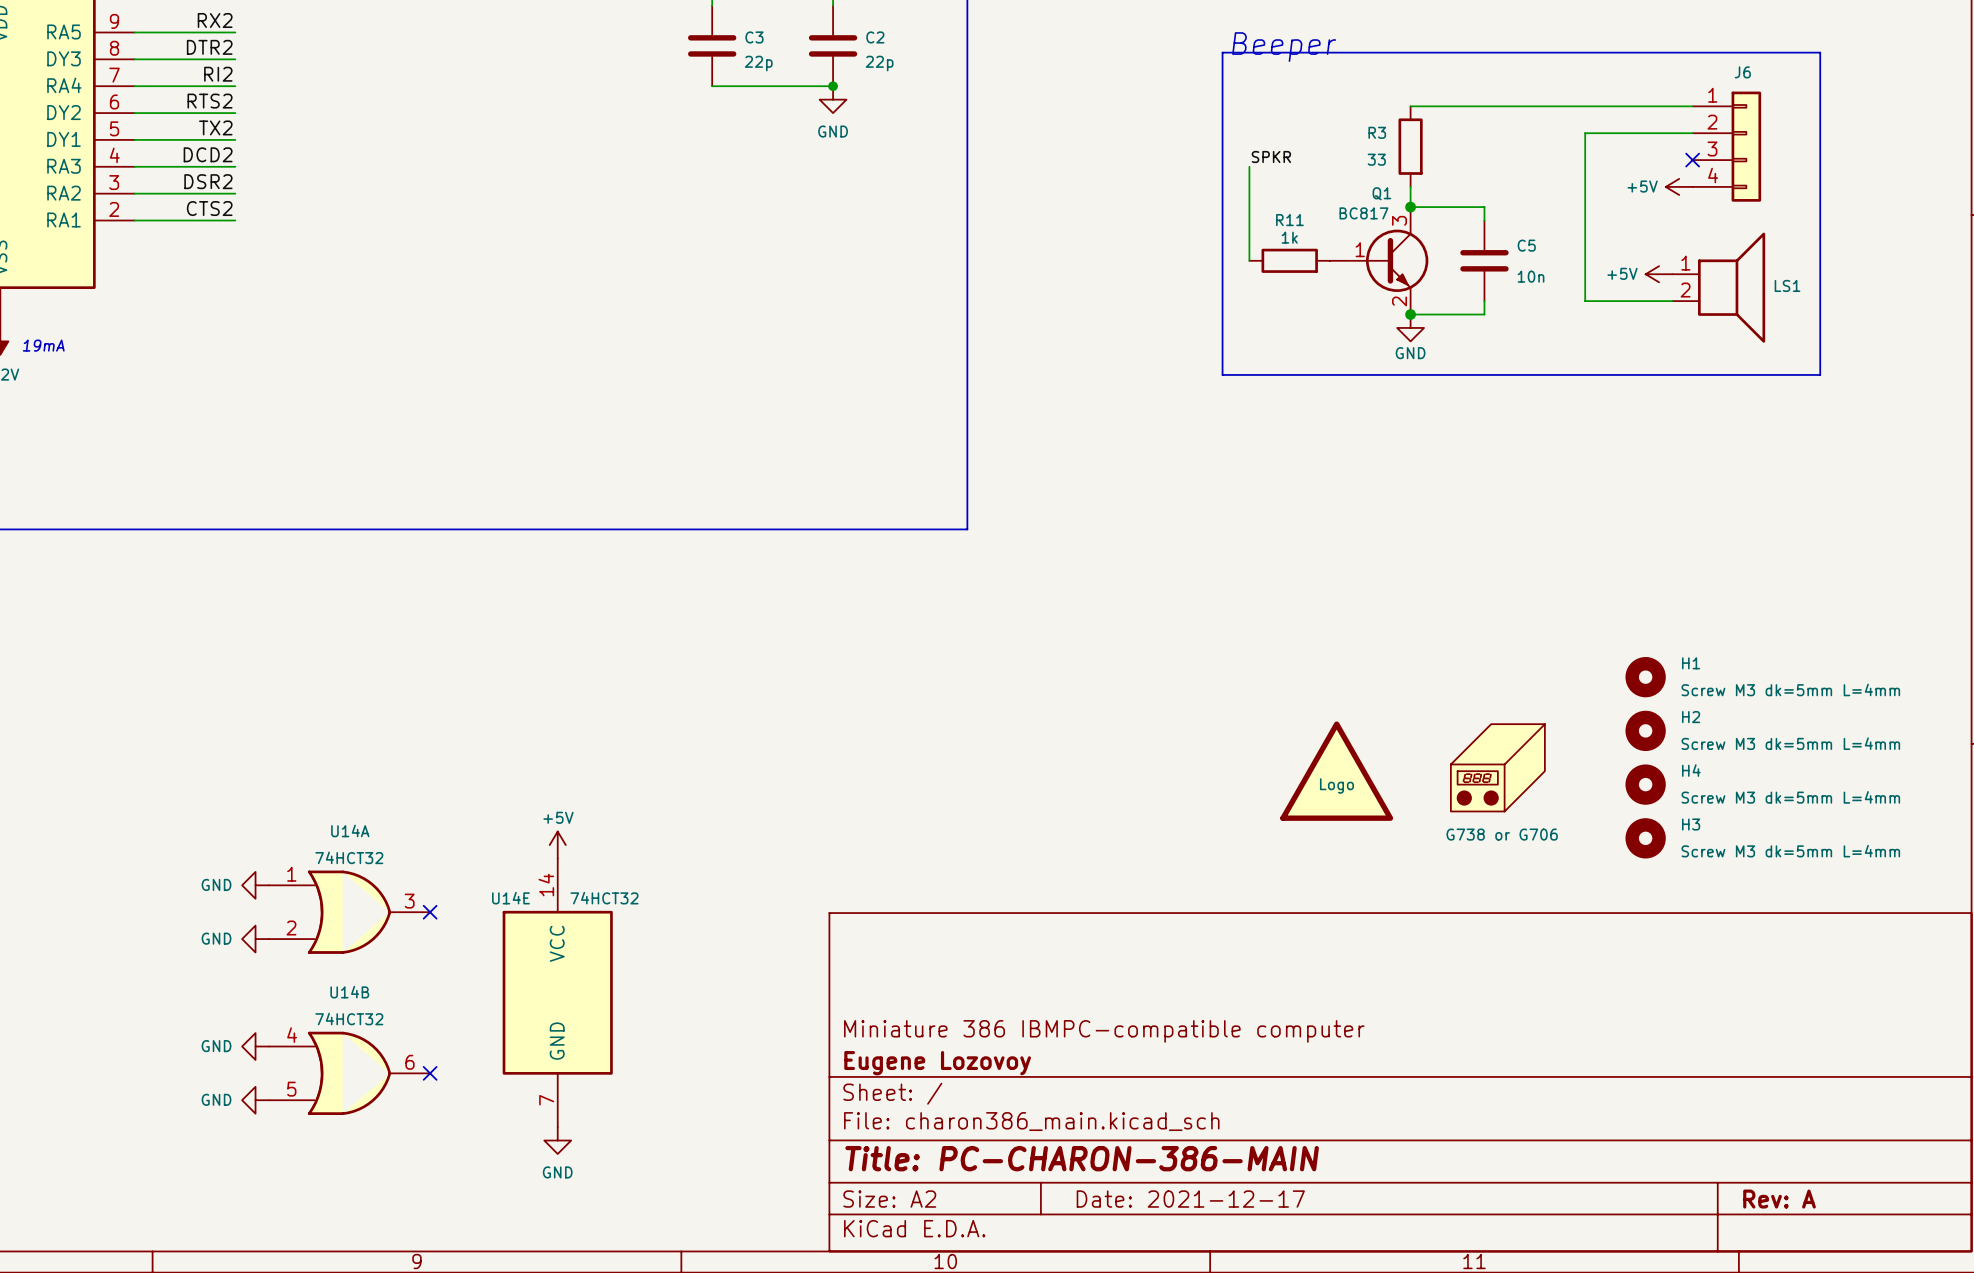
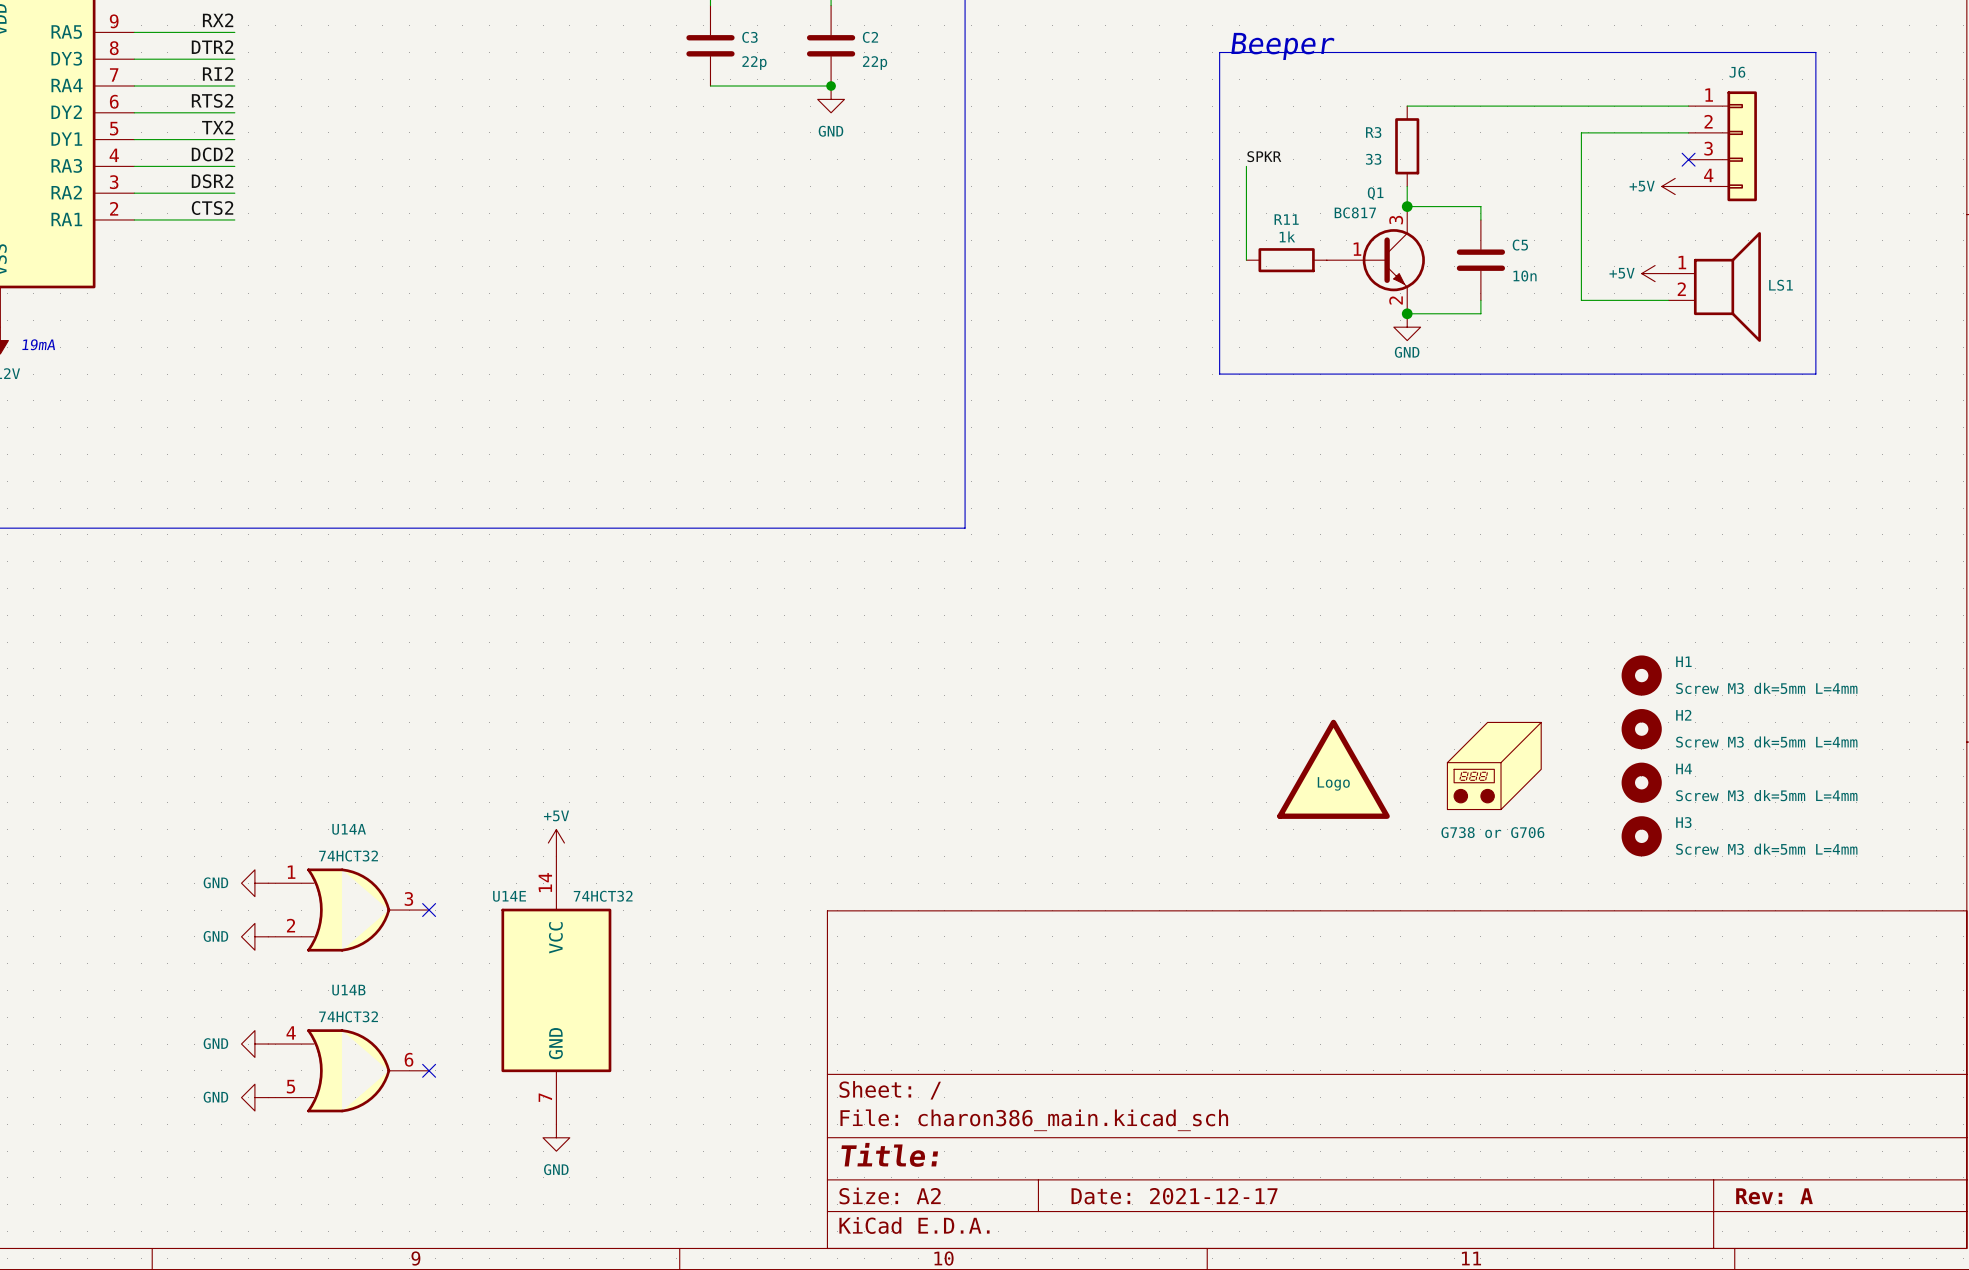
title block: Miniature 386 IBMPC-compatible computer (1104, 1031) -> none
title block: Eugene Lozovoy (937, 1063) -> none
title block: Title: PC-CHARON-386-MAIN (1082, 1158) -> Title: (889, 1154)

